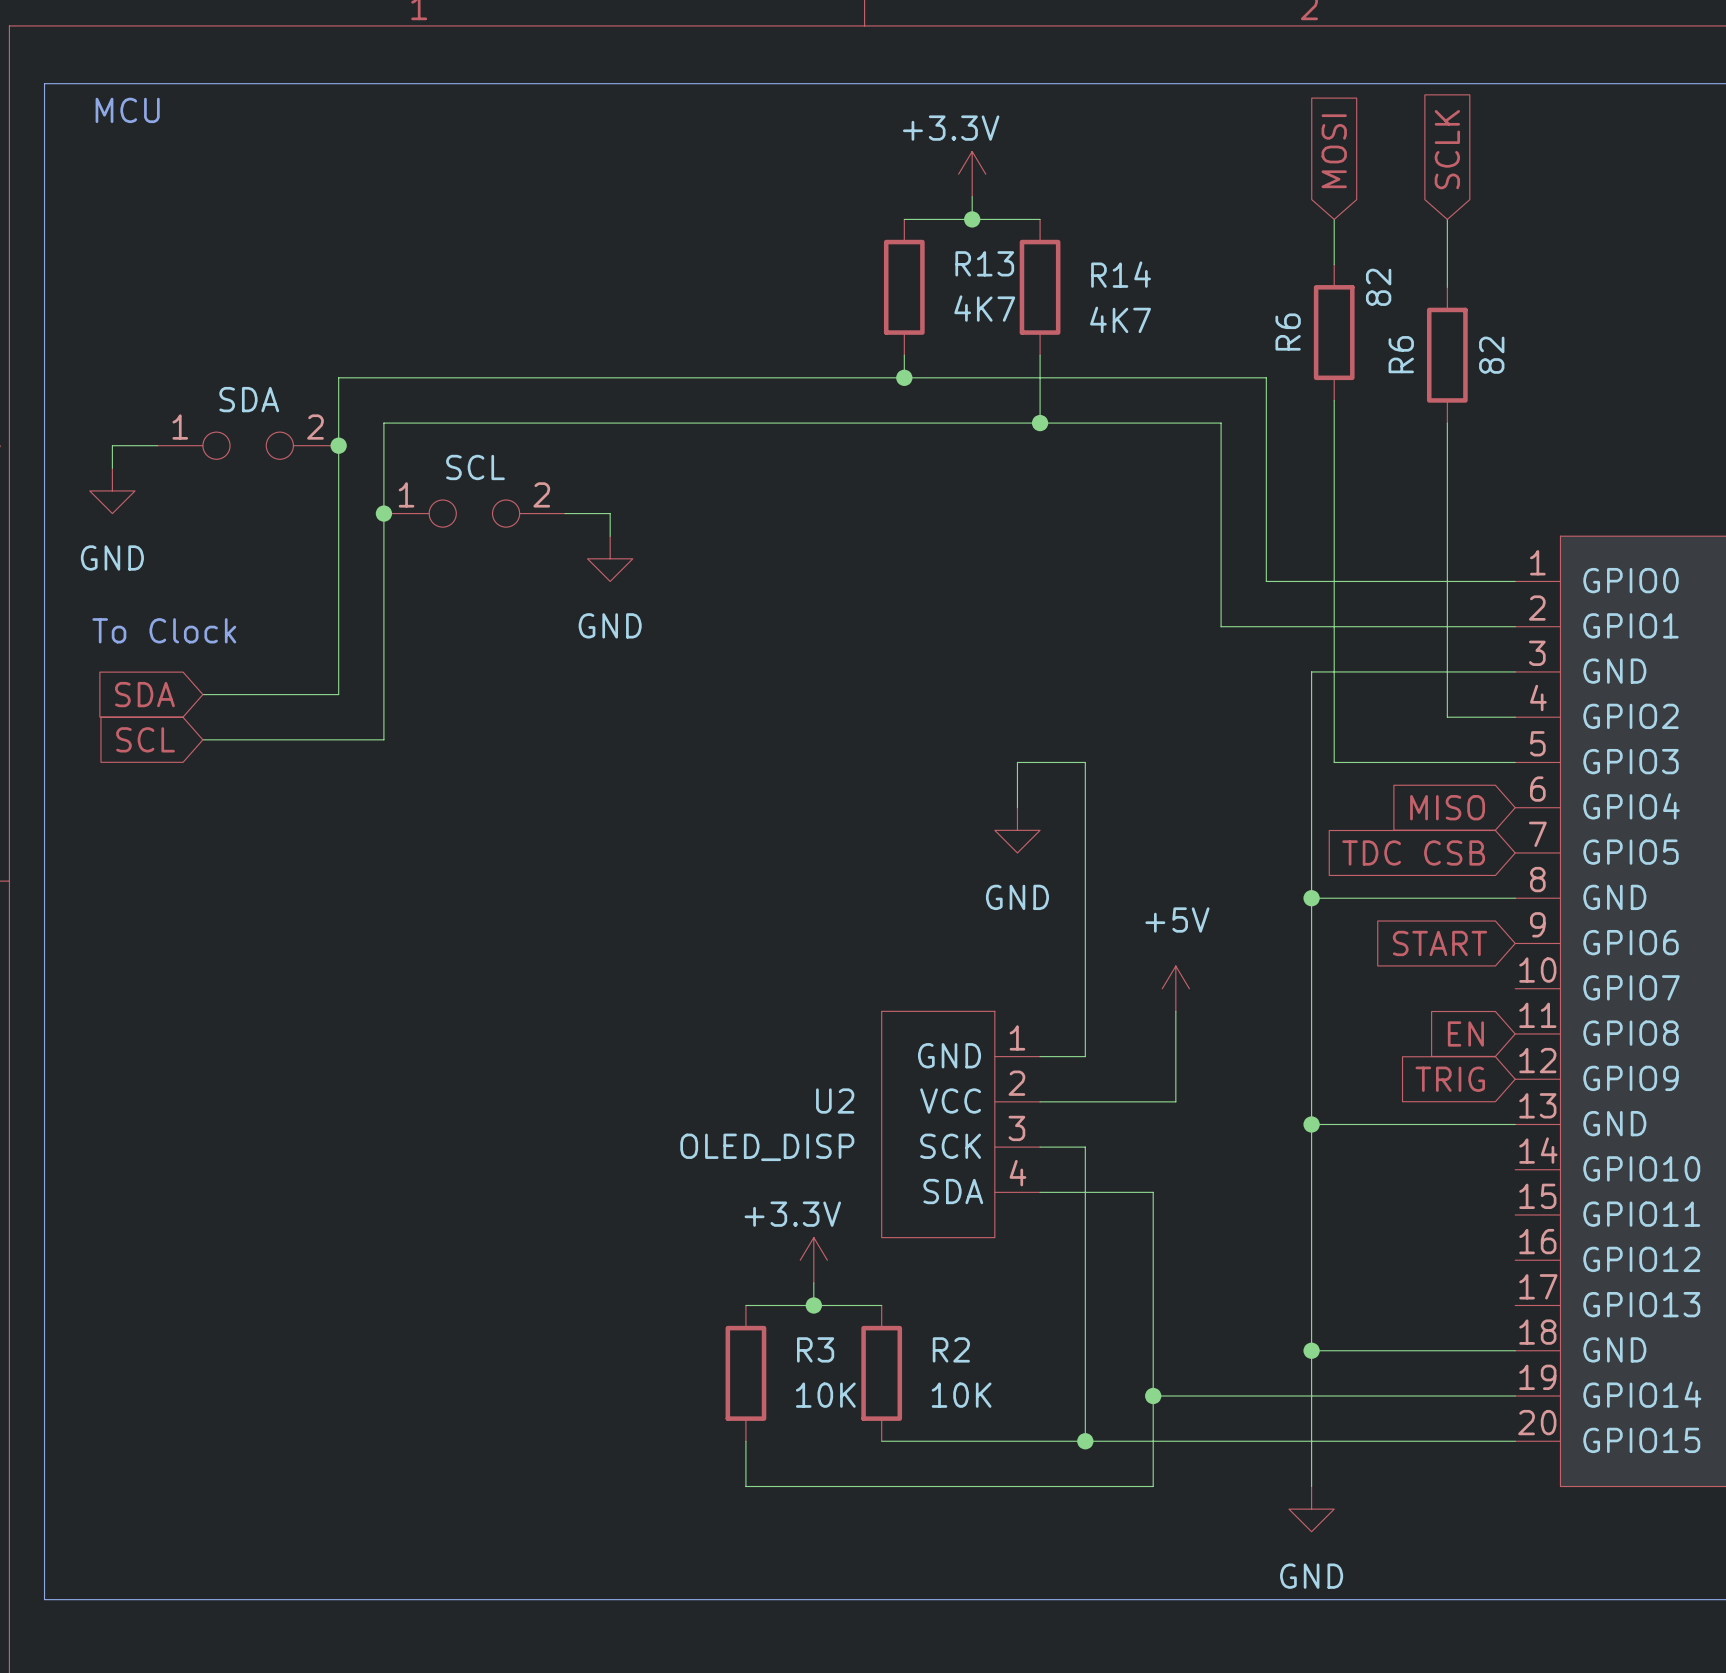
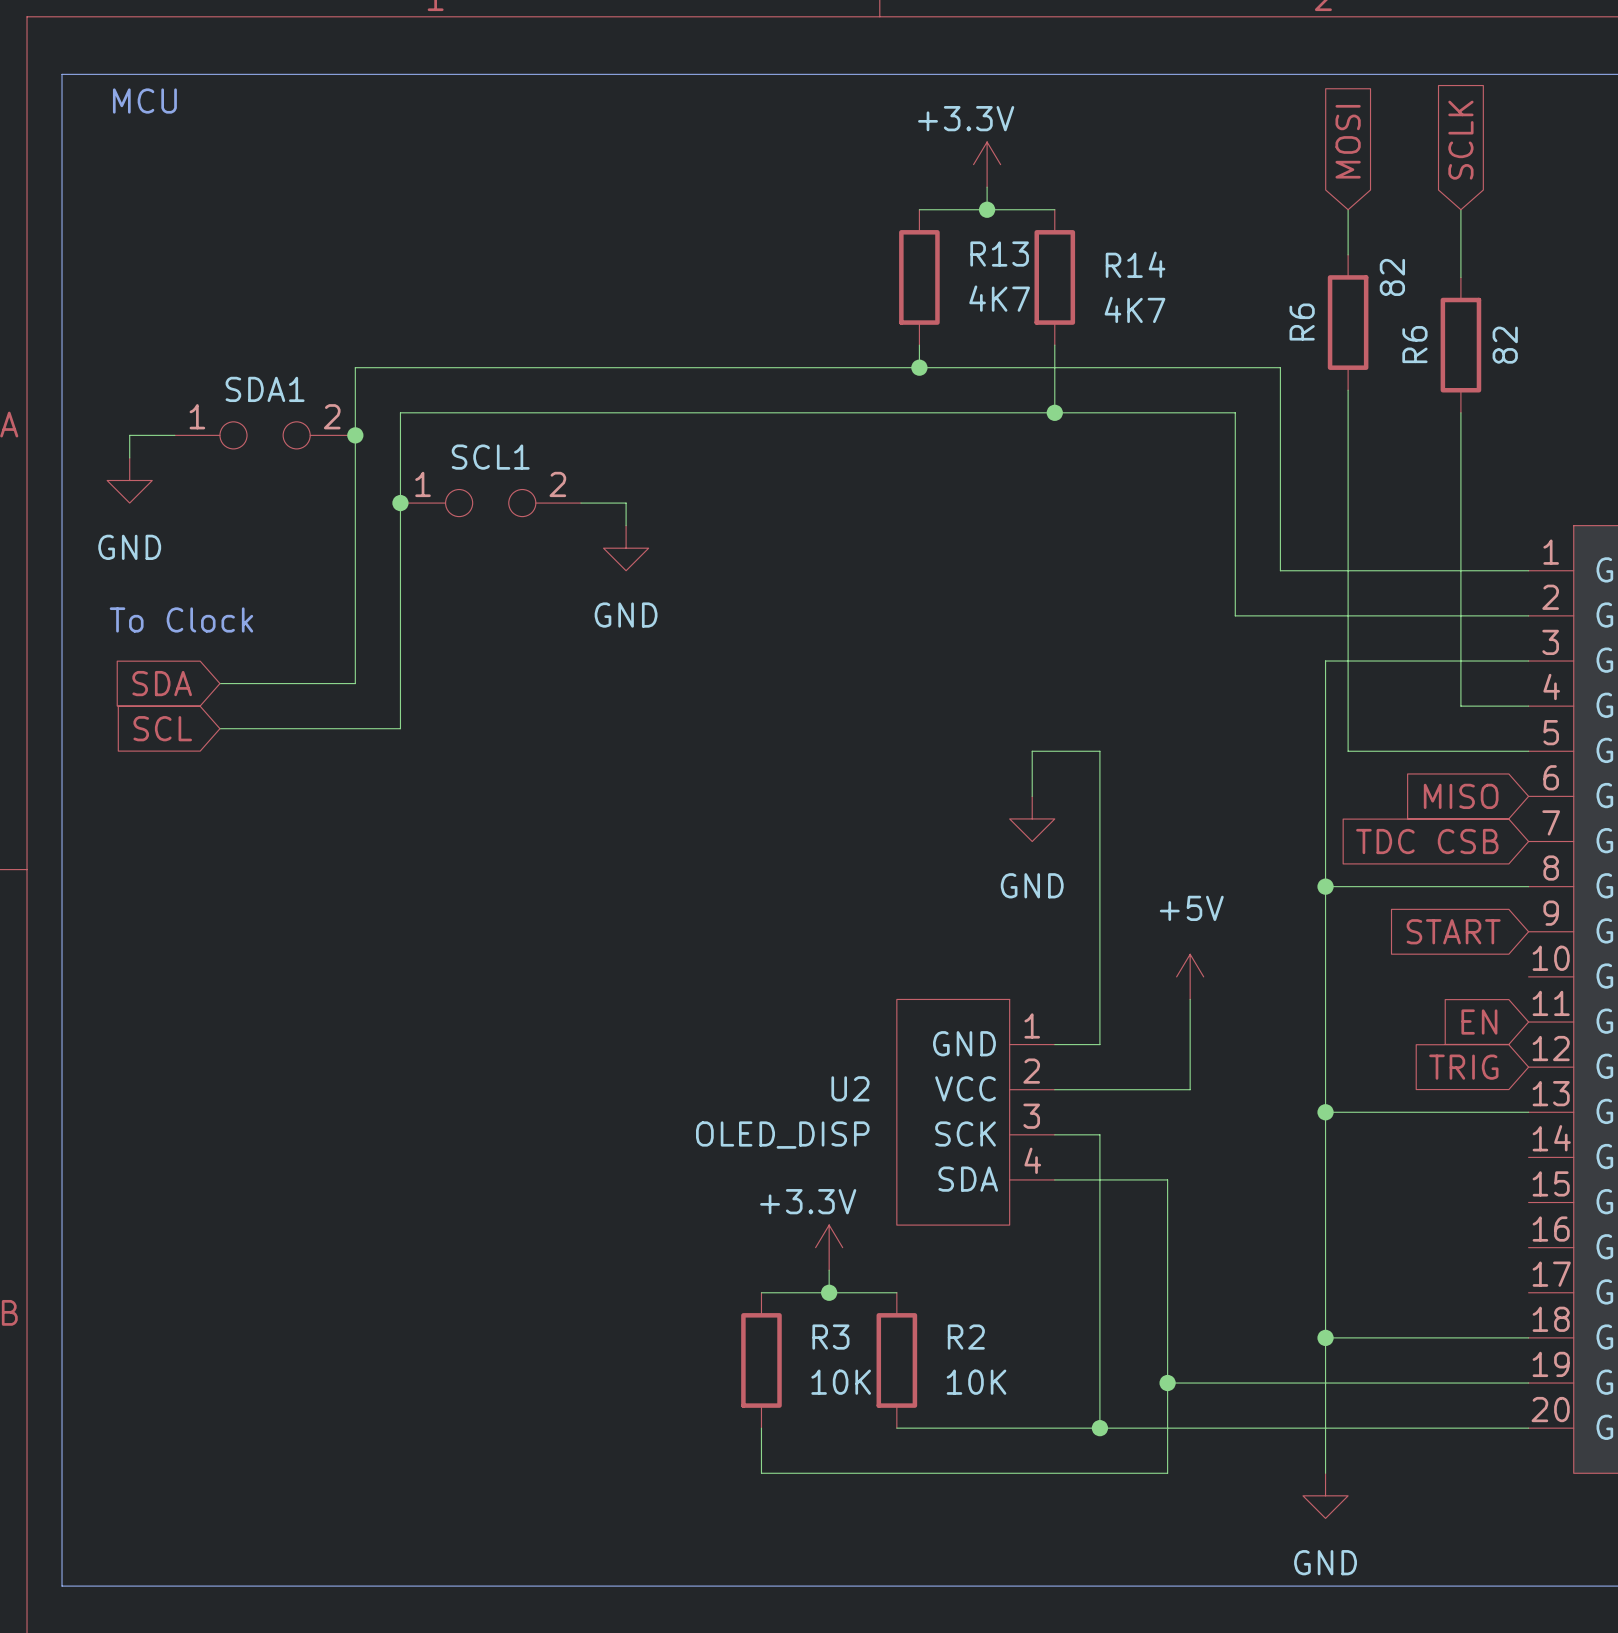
SDA name: SDA (249, 399) -> SDA1 (265, 389)
SCL name: SCL (475, 467) -> SCL1 (490, 457)

